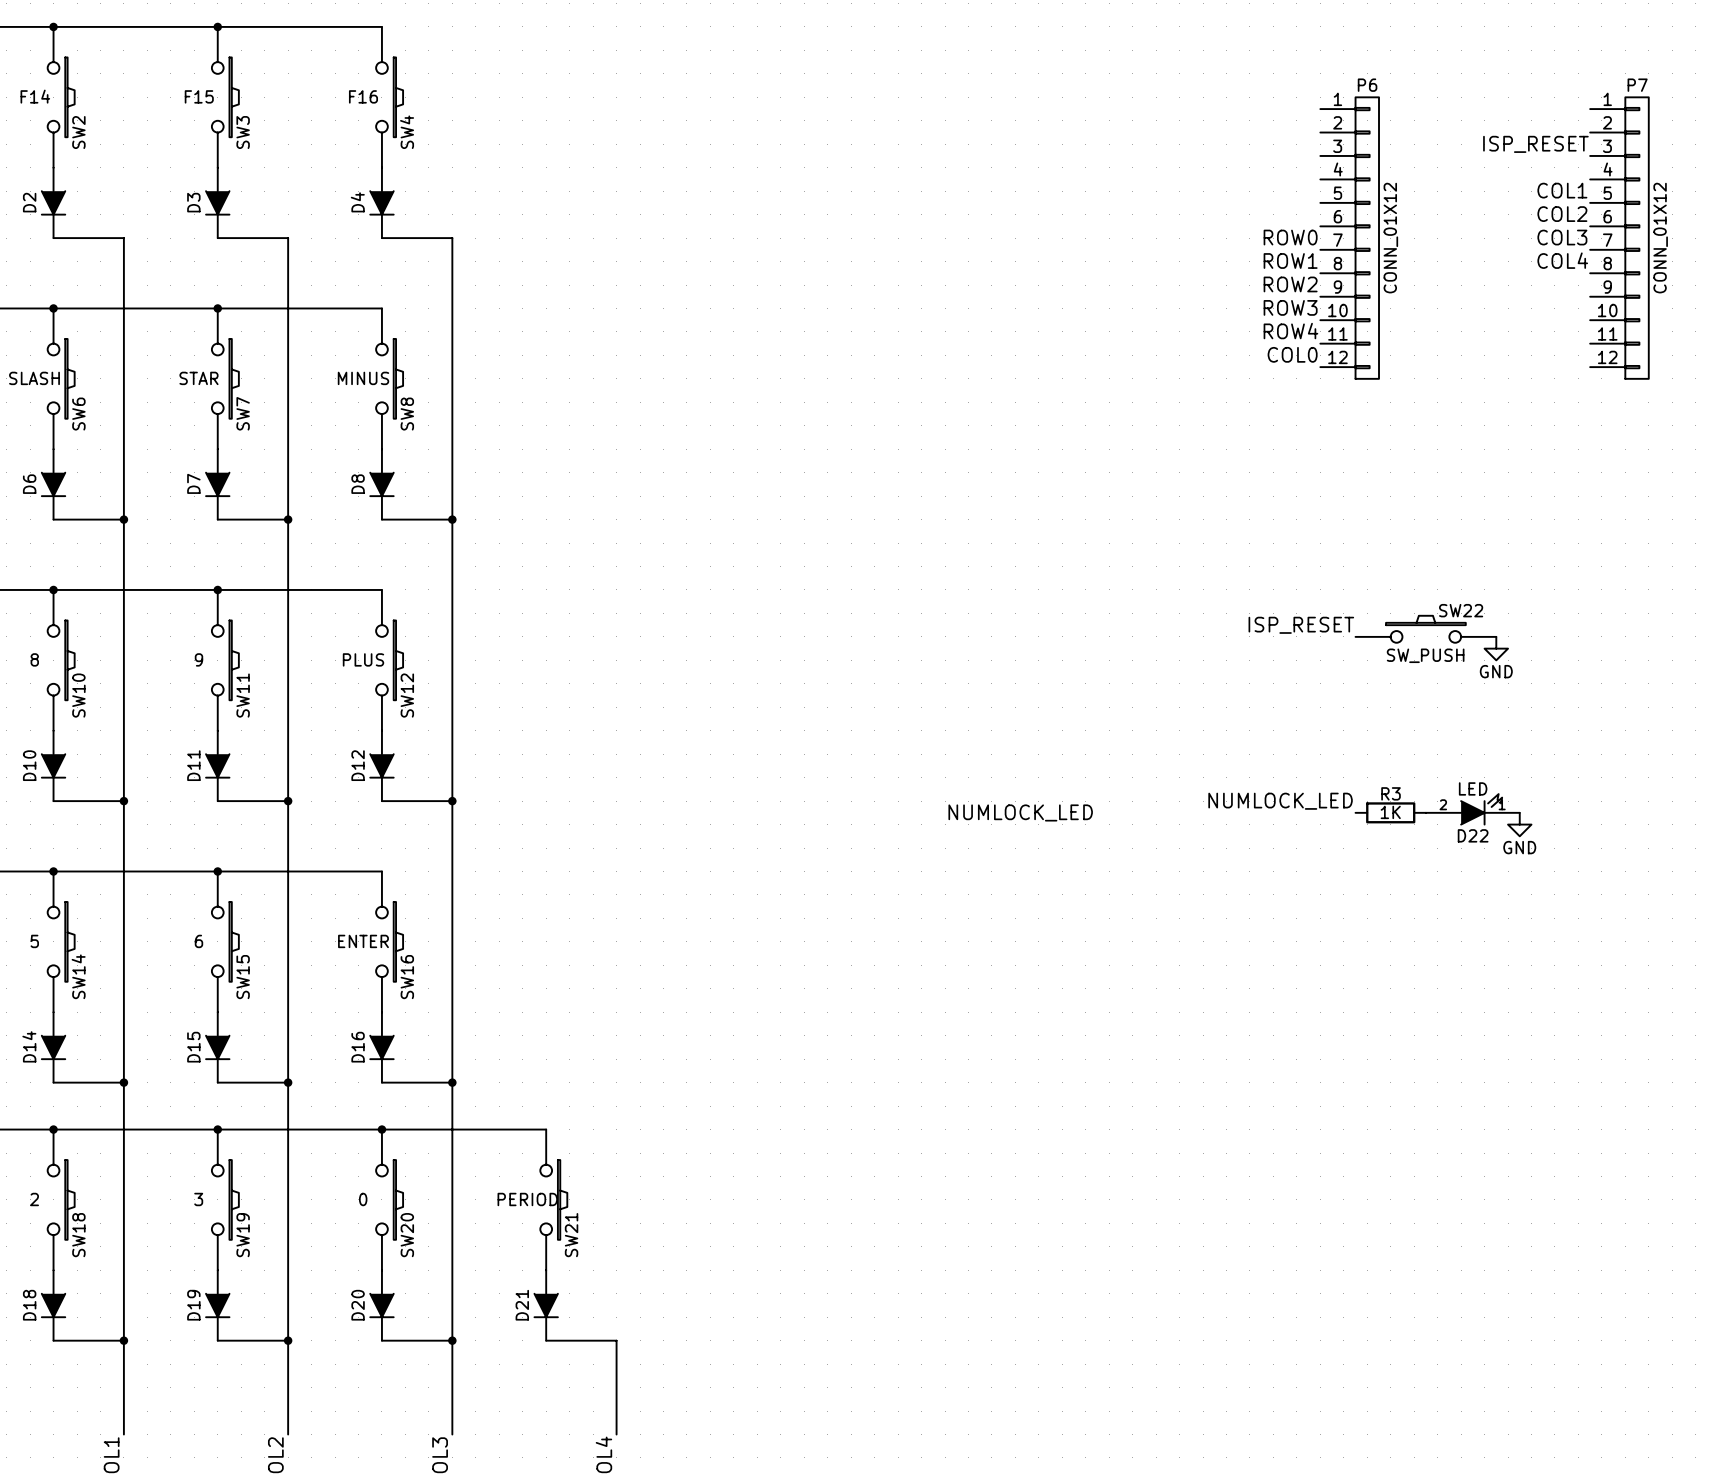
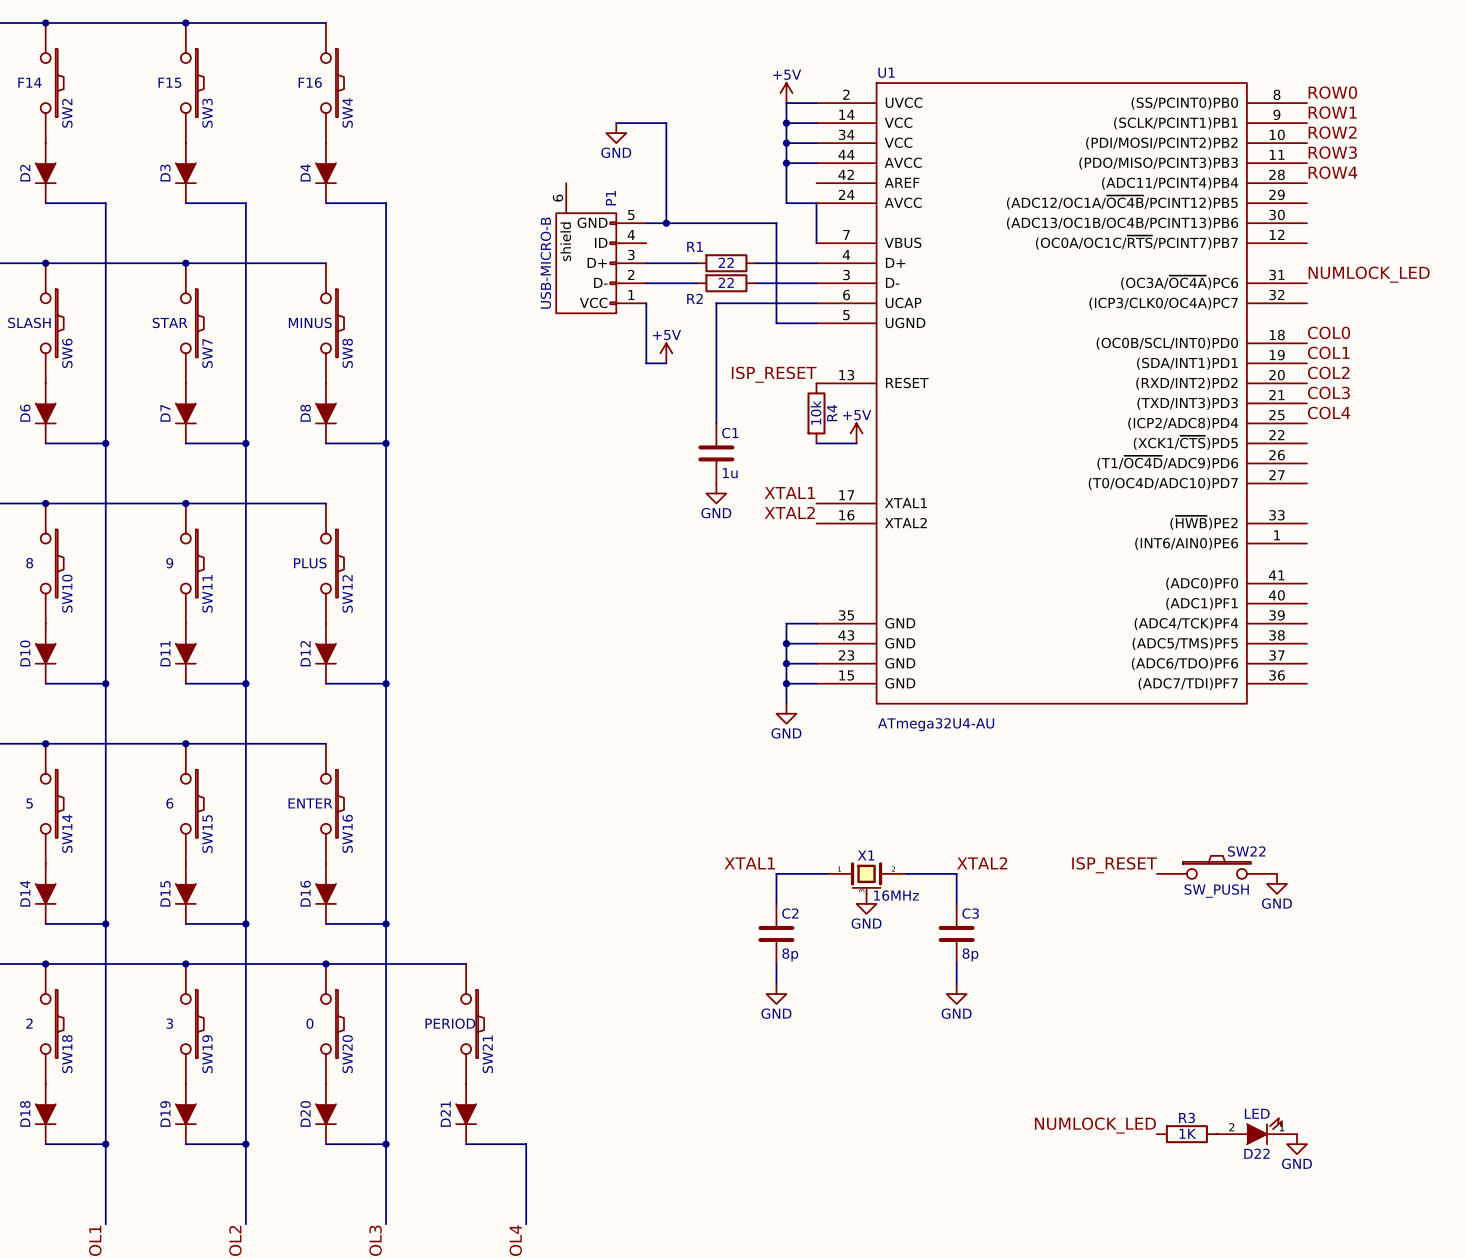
label: none -> ROW0 (1332, 92)
power symbol: none -> +5V (786, 93)
wire: none -> (816, 103) (786, 103) (786, 203) (816, 203) (816, 243)
label: none -> ROW1 (1332, 112)
wire: none -> (616, 123) (666, 123) (666, 223)
wire: none -> (786, 123) (816, 123)
junction: none -> (786, 123)
label: ISP_RESET (1535, 144) -> none
power symbol: none -> GND (616, 133)
label: none -> ROW2 (1332, 132)
wire: none -> (786, 143) (816, 143)
junction: none -> (786, 143)
label: none -> ROW3 (1332, 152)
label position: COL1 (1562, 190) -> COL1 (1328, 352)
wire: none -> (786, 163) (816, 163)
junction: none -> (786, 163)
label: none -> ROW4 (1332, 172)
label position: COL2 (1562, 214) -> COL2 (1328, 372)
label: ROW0 (1290, 237) -> none
label position: COL3 (1562, 237) -> COL3 (1328, 392)
P6: CONN_01X12 (1349, 238) -> none
P7: CONN_01X12 (1619, 238) -> none
label position: COL4 (1562, 260) -> COL4 (1329, 412)
wire: none -> (646, 223) (776, 223) (776, 323) (816, 323)
junction: none -> (666, 223)
label: ROW1 (1290, 261) -> none
label: ROW2 (1290, 284) -> none
P1: none -> USB-MICRO-B (601, 248)
label: ROW3 (1290, 307) -> none
wire: none -> (646, 263) (696, 263)
R1: none -> 22 (726, 263)
wire: none -> (756, 263) (816, 263)
label: none -> NUMLOCK_LED (1369, 274)
wire: none -> (646, 283) (696, 283)
R2: none -> 22 (726, 283)
wire: none -> (756, 283) (816, 283)
label: ROW4 (1290, 331) -> none
label position: COL0 (1292, 354) -> COL0 (1329, 332)
wire: none -> (646, 303) (646, 363) (666, 363)
wire: none -> (816, 303) (716, 303) (716, 423)
power symbol: none -> +5V (666, 353)
label: none -> ISP_RESET (774, 374)
U1: none -> ATmega32U4-AU (1061, 393)
R4: none -> 10k (816, 413)
power symbol: none -> +5V (856, 433)
wire: none -> (816, 443) (856, 443)
C1: none -> 1u (716, 453)
label: none -> XTAL1 (789, 493)
power symbol: none -> GND (716, 493)
label: none -> XTAL2 (789, 512)
label: ISP_RESET (1301, 625) -> none
SW22 position: (1425, 629) -> (1216, 867)
power symbol: GND (1496, 648) -> none
wire: none -> (816, 623) (786, 623) (786, 703)
wire: none -> (786, 643) (816, 643)
junction: none -> (786, 643)
wire: none -> (786, 663) (816, 663)
junction: none -> (786, 663)
wire: none -> (786, 683) (816, 683)
junction: none -> (786, 683)
label: NUMLOCK_LED (1280, 801) -> none
D22 position: (1472, 809) -> (1256, 1131)
label: NUMLOCK_LED (1020, 812) -> none
R3 position: (1390, 812) -> (1186, 1134)
power symbol: GND (1519, 824) -> none
power symbol: none -> GND (786, 713)
label: none -> XTAL1 (749, 863)
label: none -> XTAL2 (982, 863)
label: none -> ISP_RESET (1114, 865)
wire: none -> (826, 873) (776, 873) (776, 903)
wire: none -> (906, 873) (956, 873) (956, 903)
X1: none -> 16MHz (866, 878)
power symbol: none -> GND (1276, 883)
power symbol: none -> GND (866, 903)
C2: none -> 8p (776, 933)
C3: none -> 8p (956, 933)
wire: none -> (776, 963) (776, 984)
wire: none -> (956, 963) (956, 984)
power symbol: none -> GND (776, 994)
power symbol: none -> GND (956, 994)
label: none -> NUMLOCK_LED (1095, 1125)
power symbol: none -> GND (1297, 1144)

